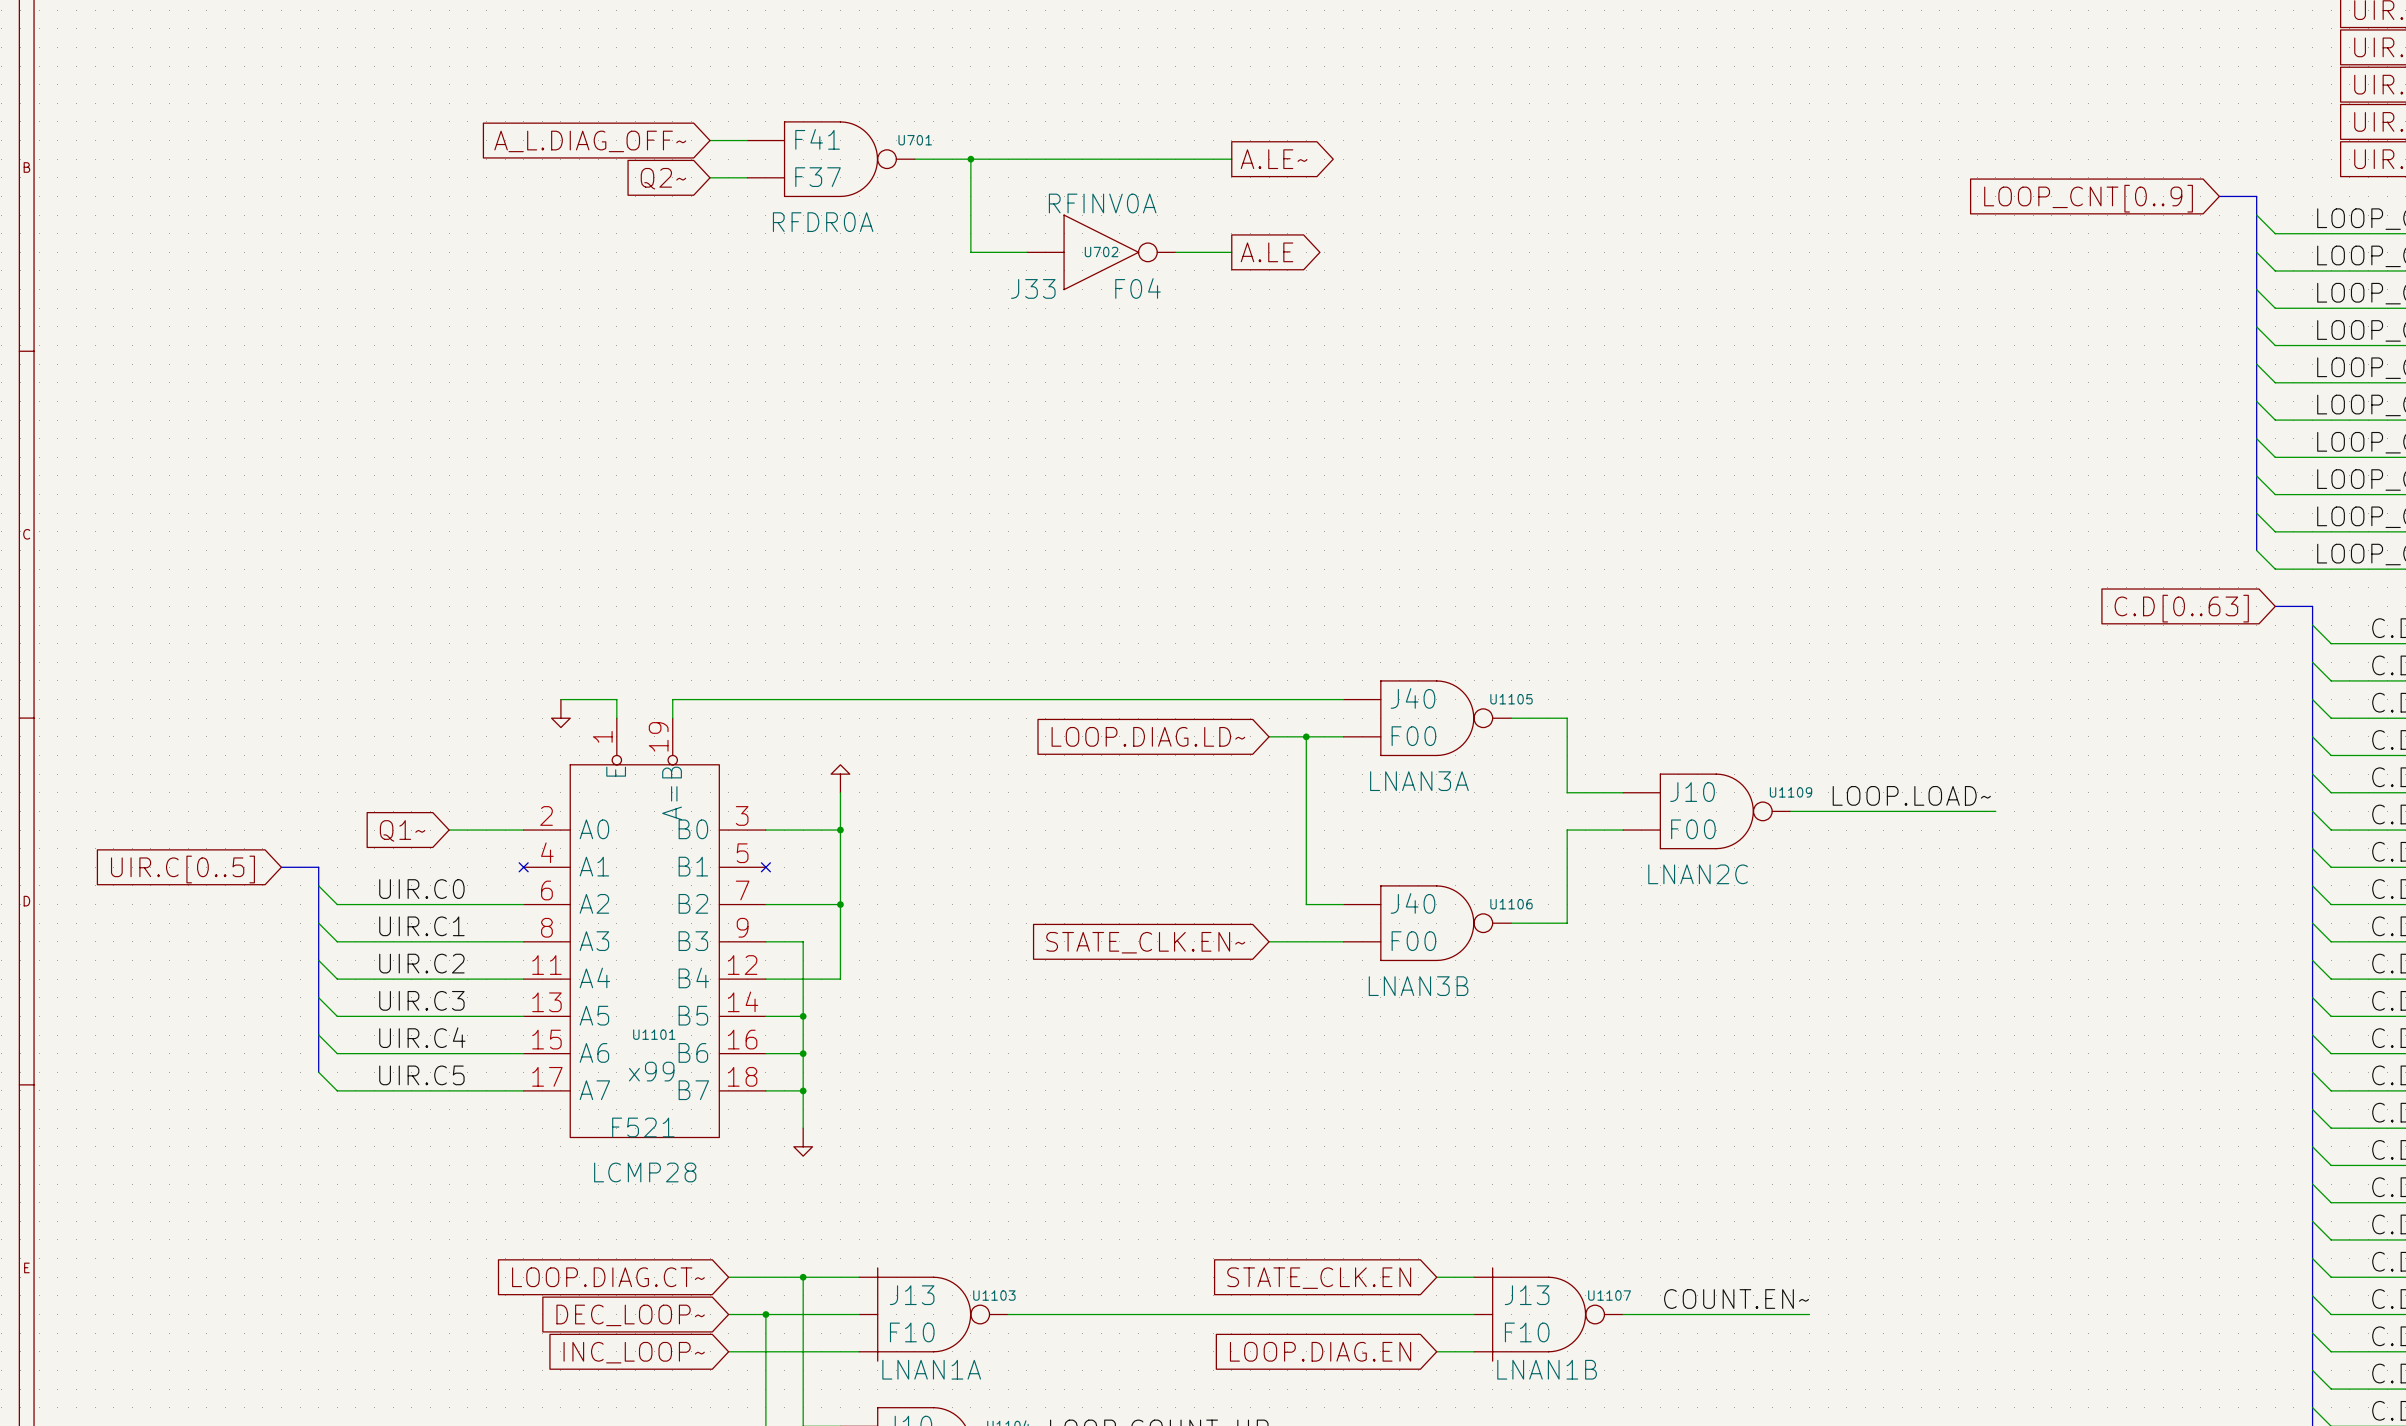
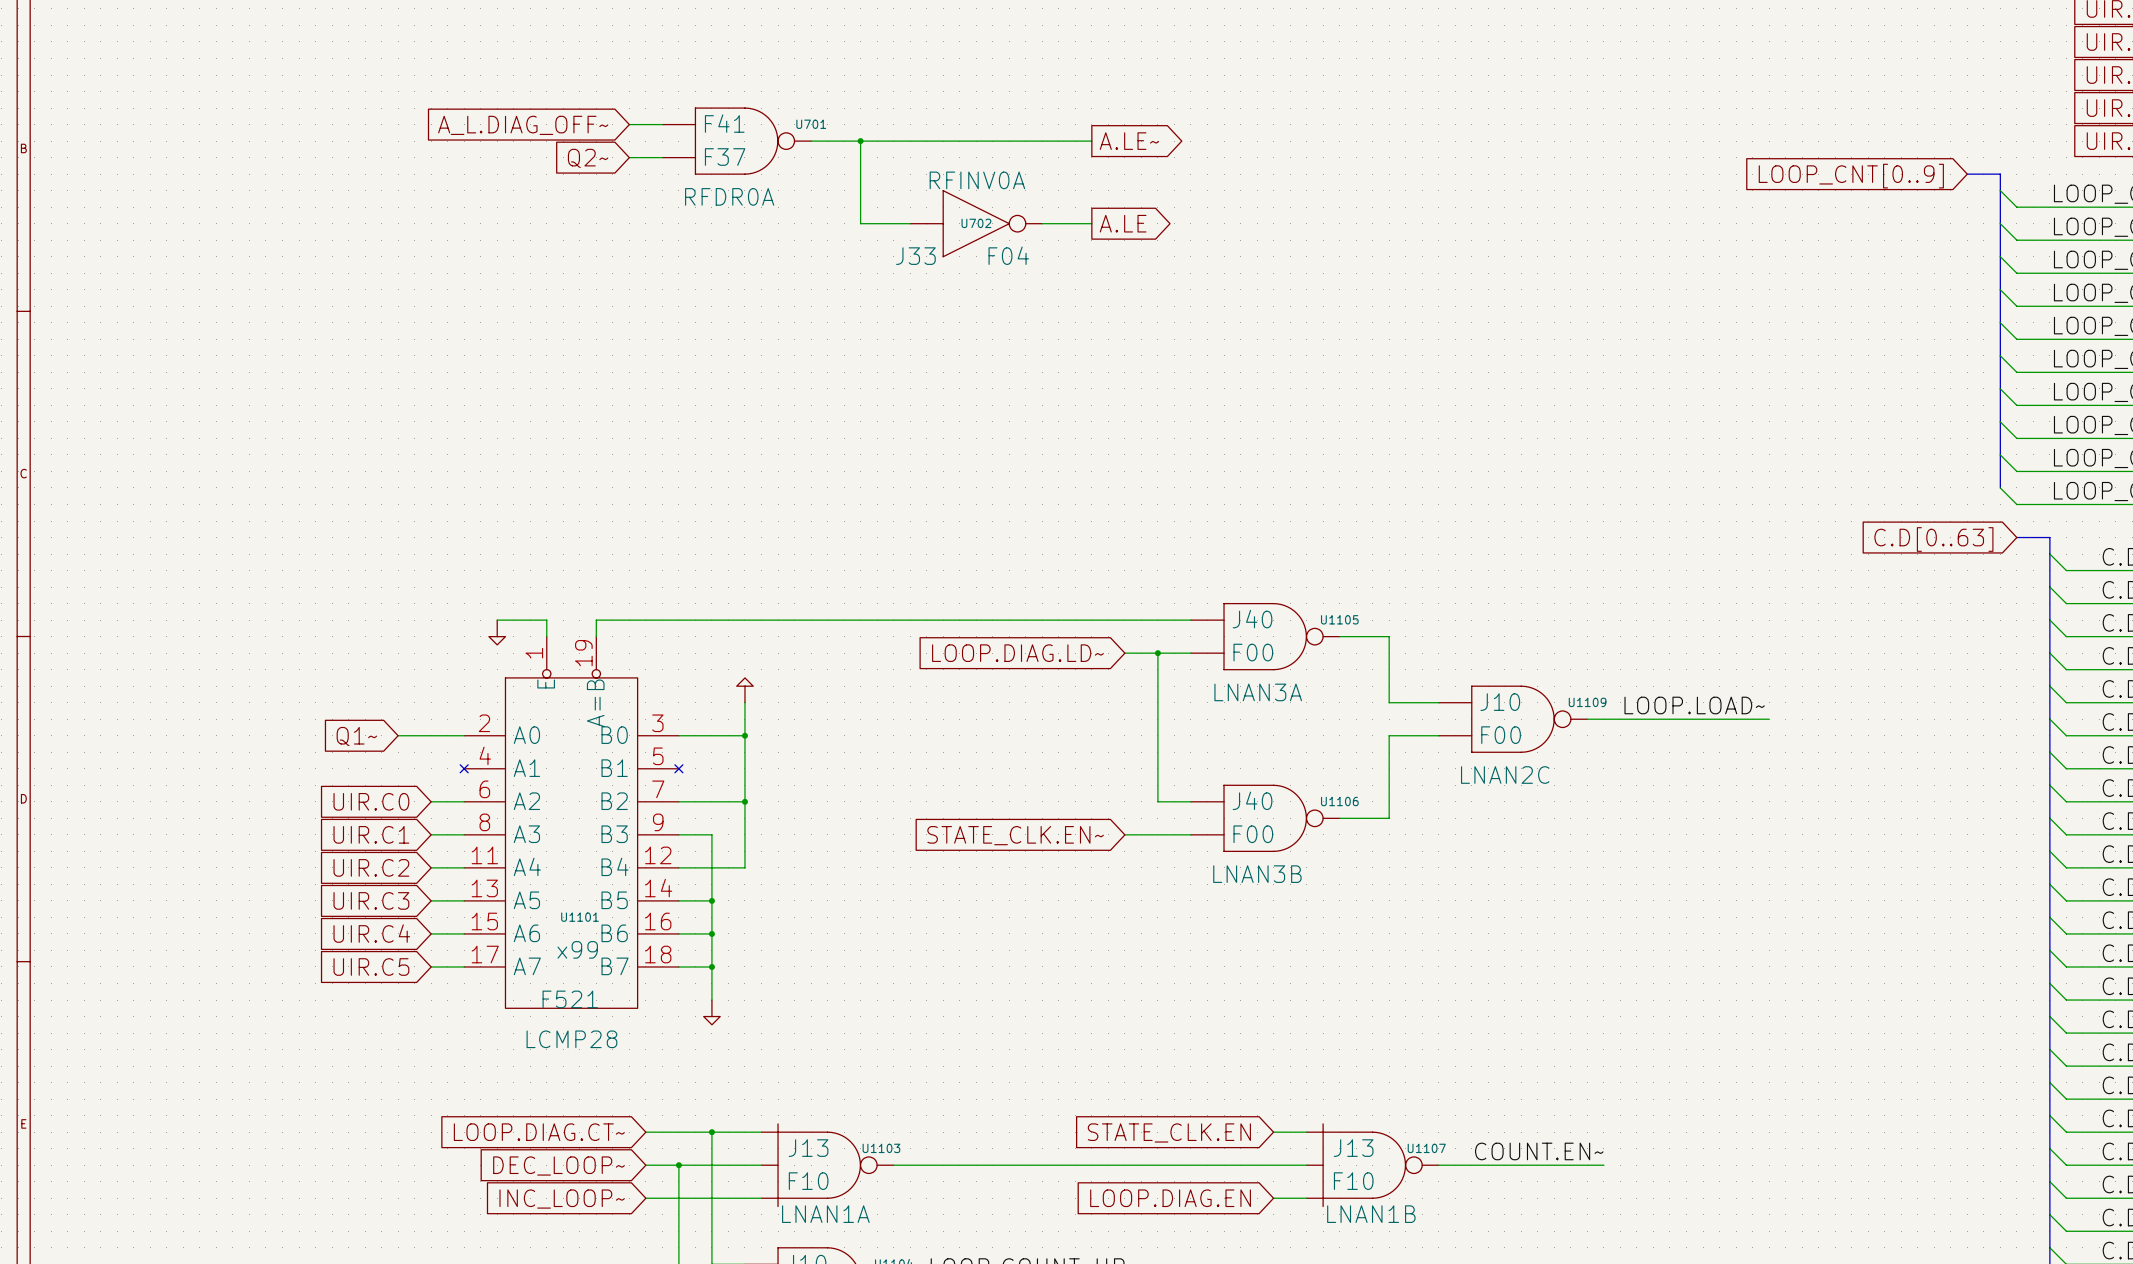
bus: (281, 867) (318, 867) (318, 1072) -> none
global label: UIR.C[0..5] (182, 869) -> none
wire: (318, 885) (337, 904) (486, 904) -> none
label: UIR.C0 (421, 889) -> none
global label: none -> UIR.C0 (371, 801)
wire: (318, 923) (337, 941) (486, 941) -> none
label: UIR.C1 (421, 926) -> none
global label: none -> UIR.C1 (371, 834)
wire: (318, 960) (337, 979) (486, 979) -> none
label: UIR.C2 (421, 963) -> none
global label: none -> UIR.C2 (371, 867)
wire: (318, 997) (337, 1016) (486, 1016) -> none
label: UIR.C3 (421, 1000) -> none
global label: none -> UIR.C3 (371, 900)
wire: (318, 1035) (337, 1053) (486, 1053) -> none
label: UIR.C4 (422, 1037) -> none
global label: none -> UIR.C4 (371, 933)
wire: (318, 1072) (337, 1090) (486, 1090) -> none
label: UIR.C5 (421, 1075) -> none
global label: none -> UIR.C5 (371, 966)

